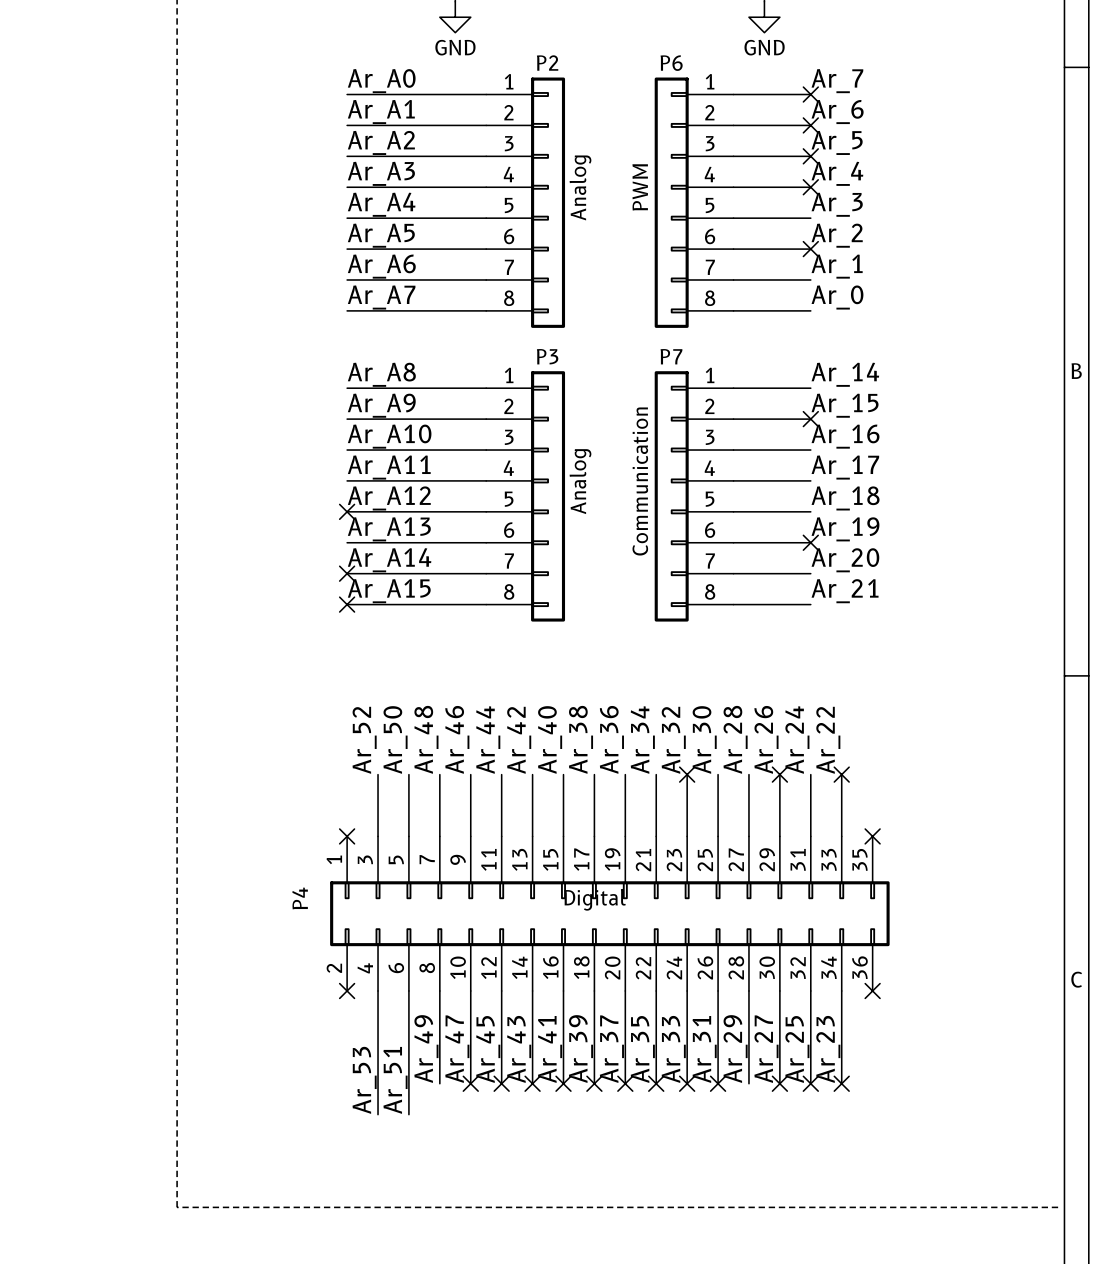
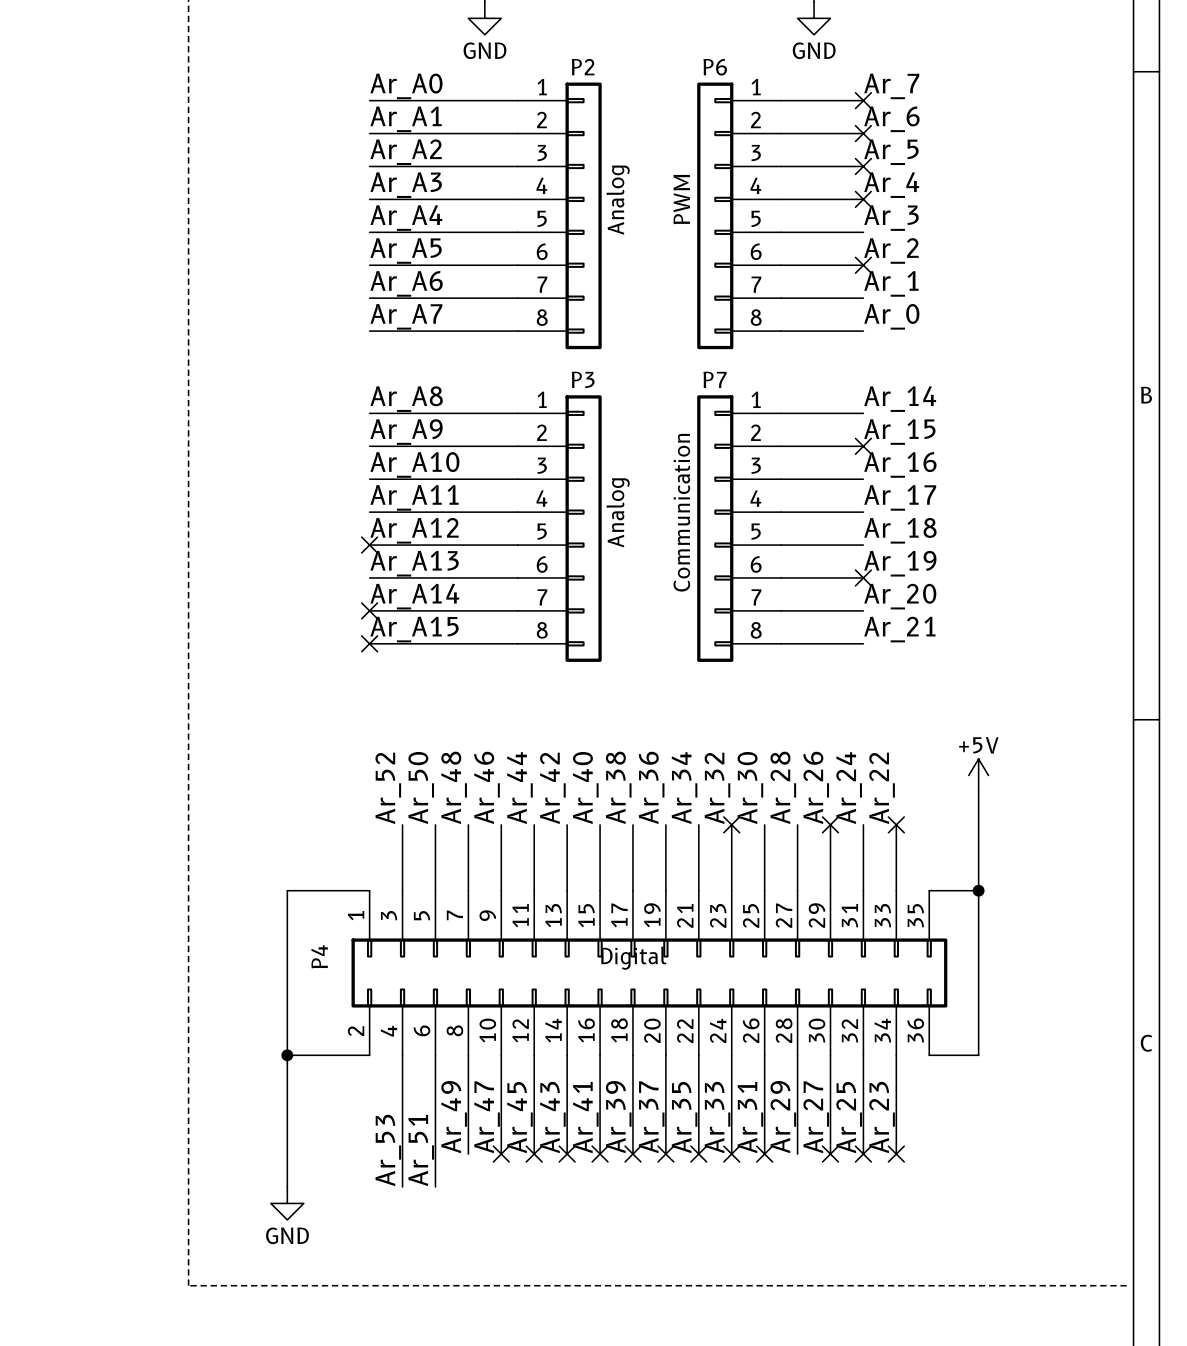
power symbol: none -> +5V (978, 775)
wire: none -> (978, 791) (978, 1055) (929, 1055)
wire: none -> (369, 890) (287, 890) (287, 1186)
no-connect mark: (347, 836) -> none
wire: none -> (929, 890) (978, 890)
no-connect mark: (872, 836) -> none
junction: none -> (978, 890)
wire: none -> (287, 1055) (369, 1055)
junction: none -> (287, 1055)
no-connect mark: (347, 991) -> none
no-connect mark: (872, 991) -> none
power symbol: none -> GND (287, 1203)

